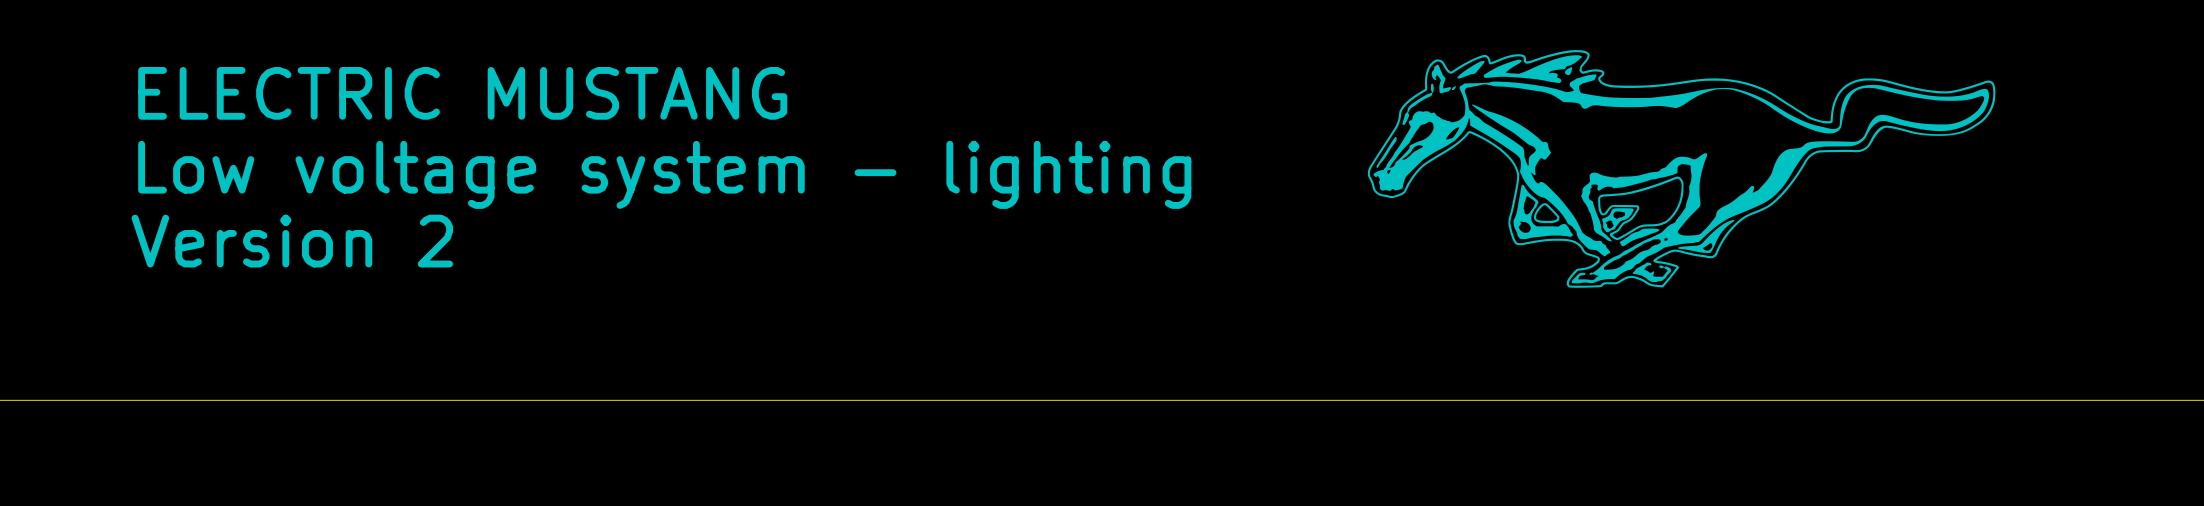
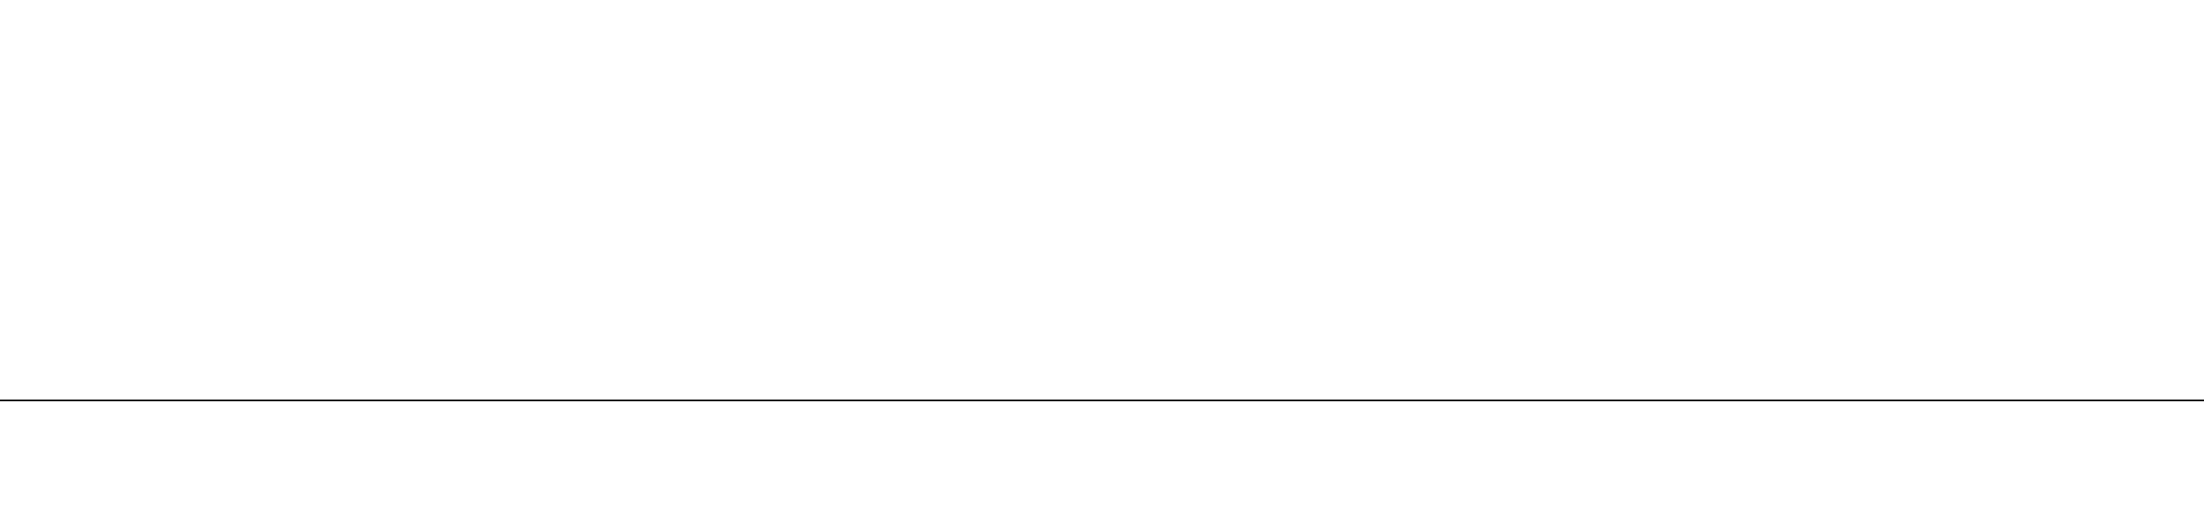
drawing: [1367, 50, 1996, 288] -> none
text: ELECTRIC MUSTANG (462, 93) -> none
text: Low voltage system - lighting (664, 174) -> none
text: Version 2 (292, 241) -> none

